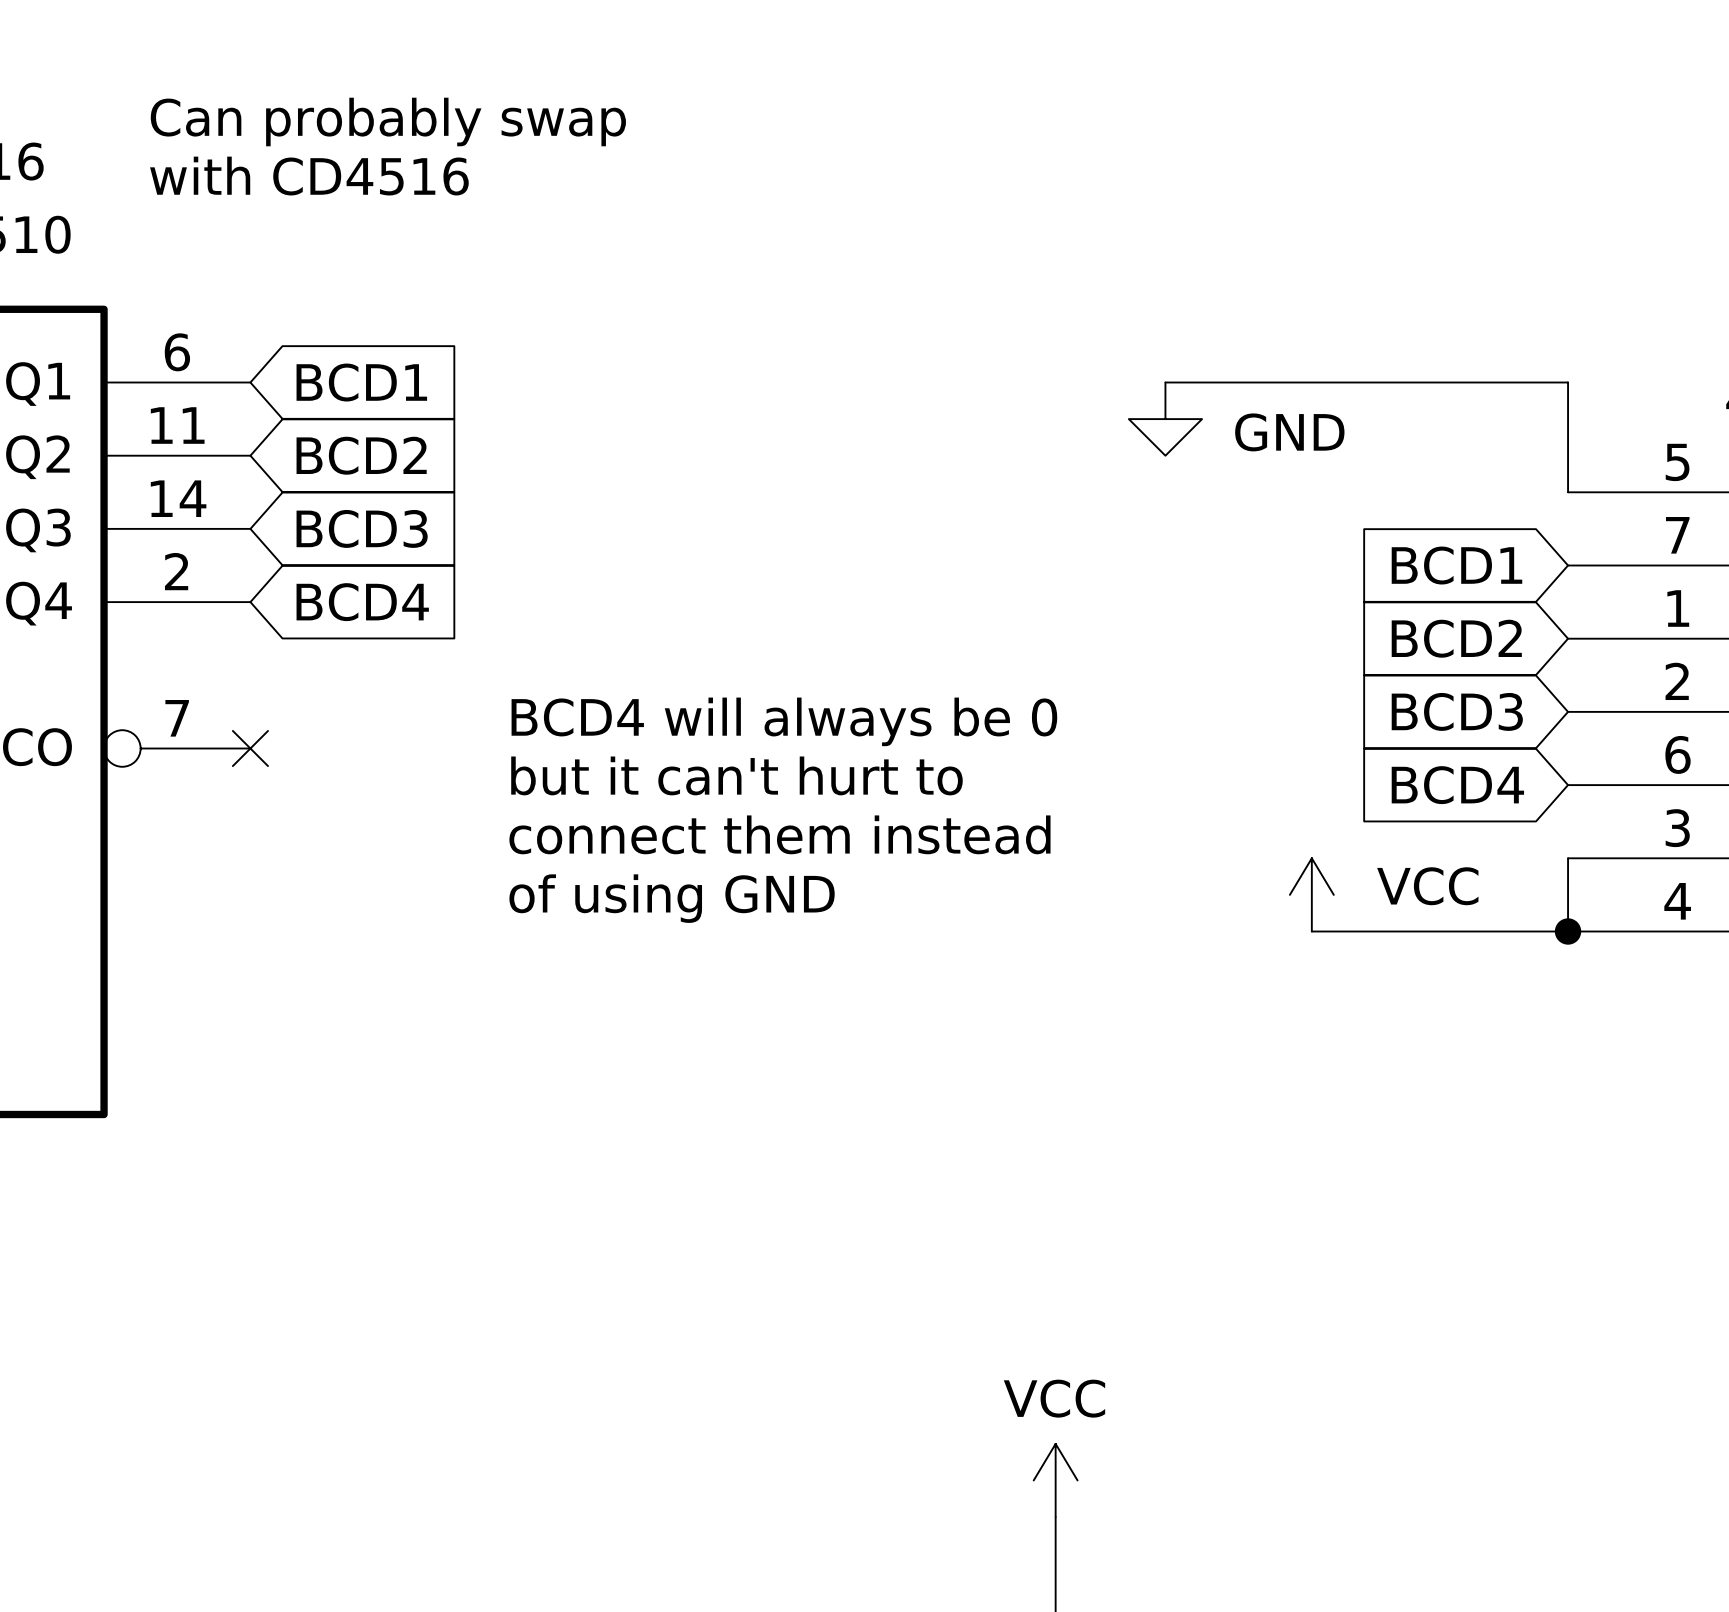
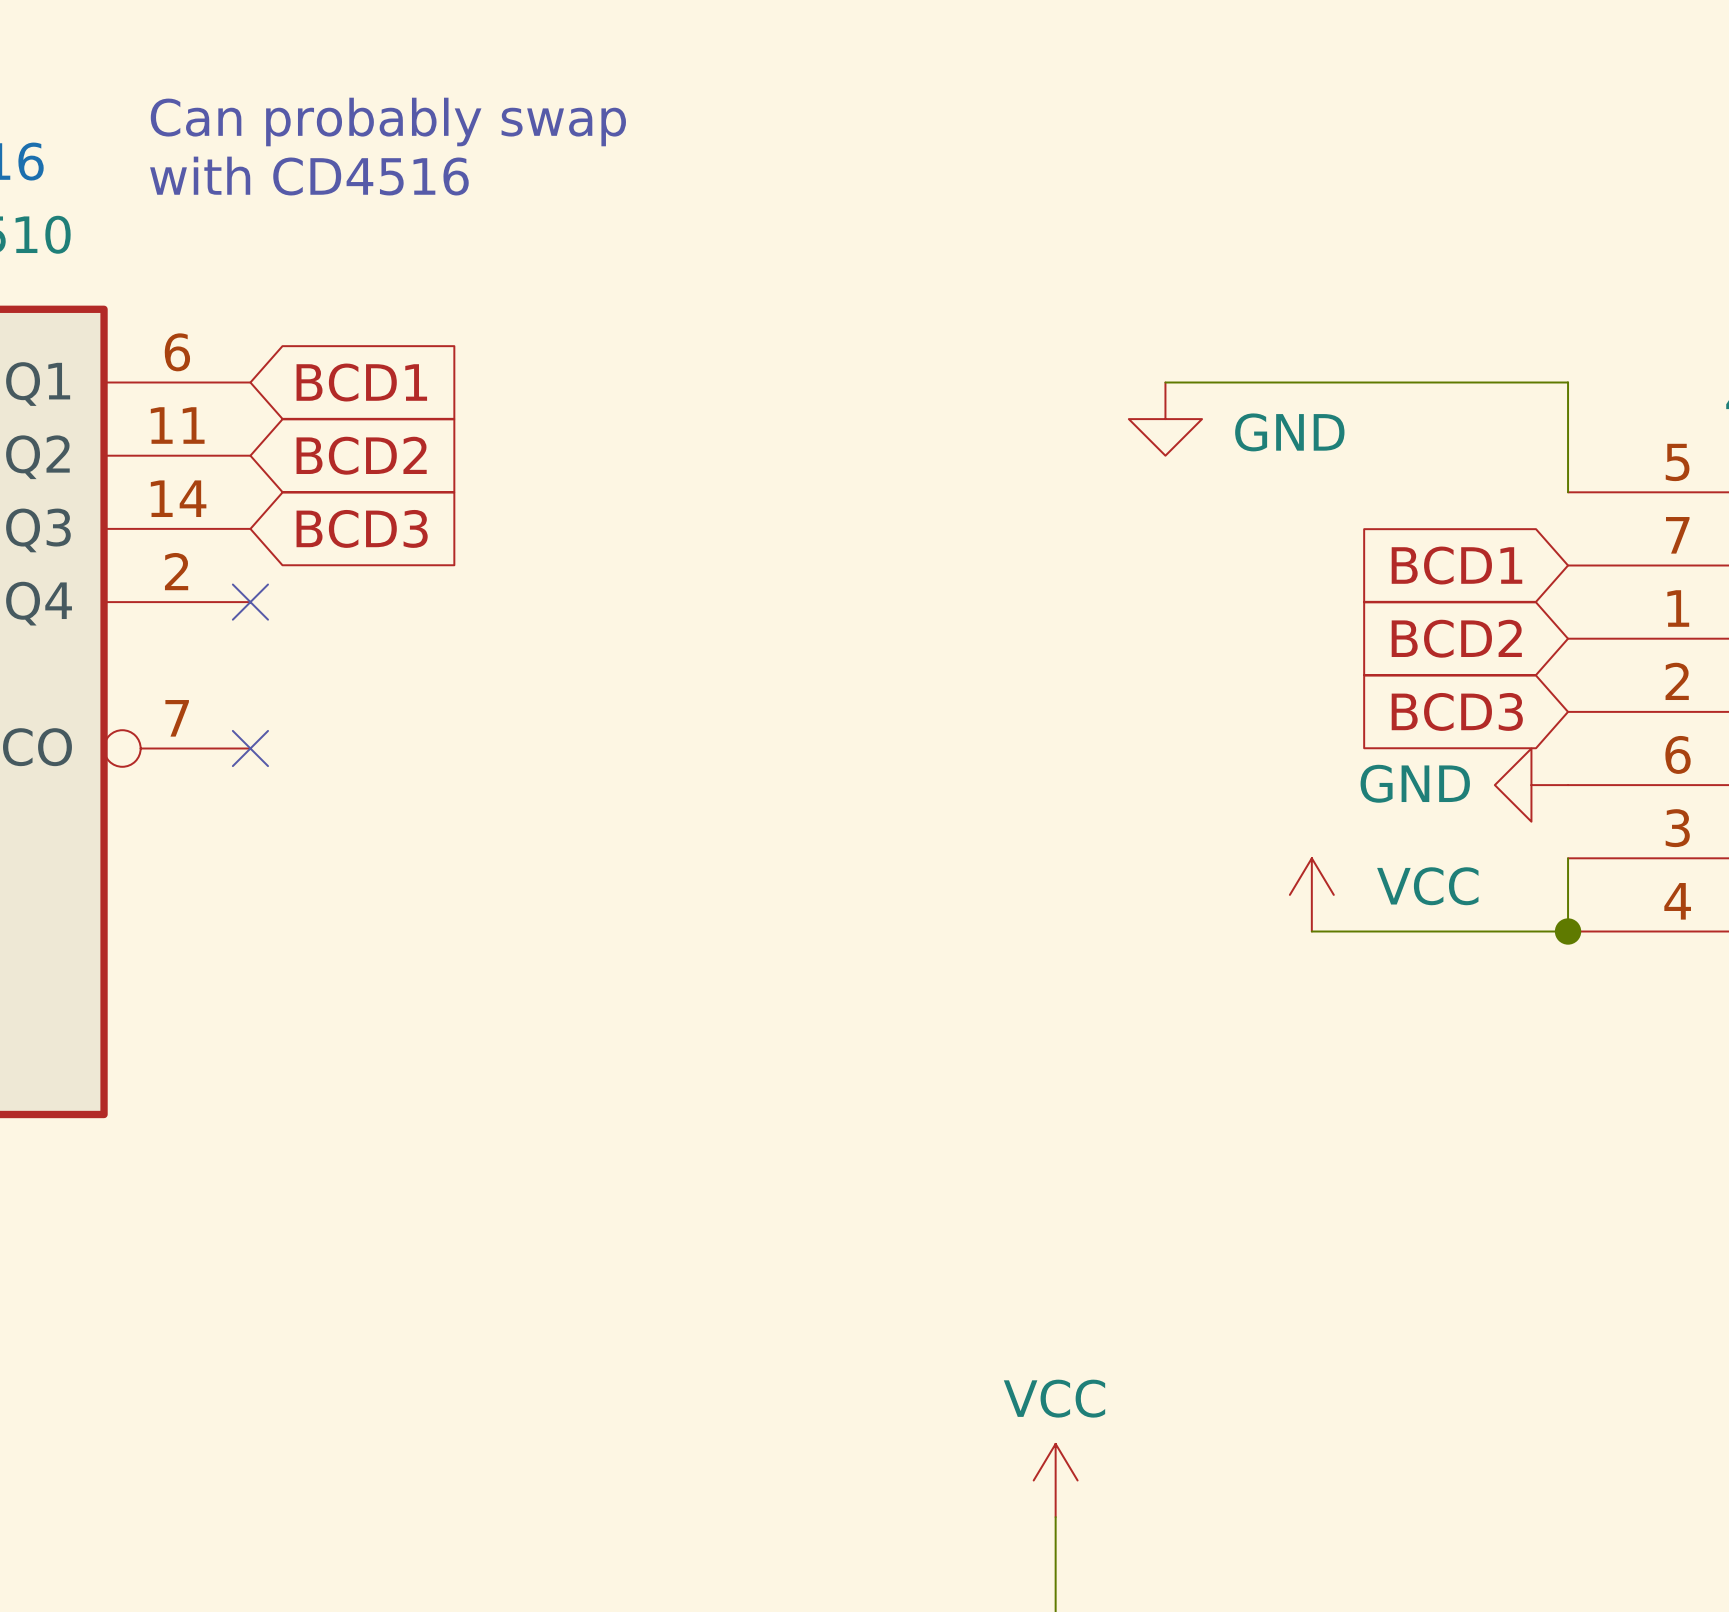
no-connect mark: none -> (250, 602)
global label: BCD4 (362, 602) -> none
text: BCD4 will always be 0 (784, 721) -> none
text: but it can't hurt to (736, 775) -> none
global label: BCD4 (1457, 785) -> none
power symbol: none -> GND (1531, 785)
text: connect them instead (779, 834) -> none
text: of using GND (672, 898) -> none

